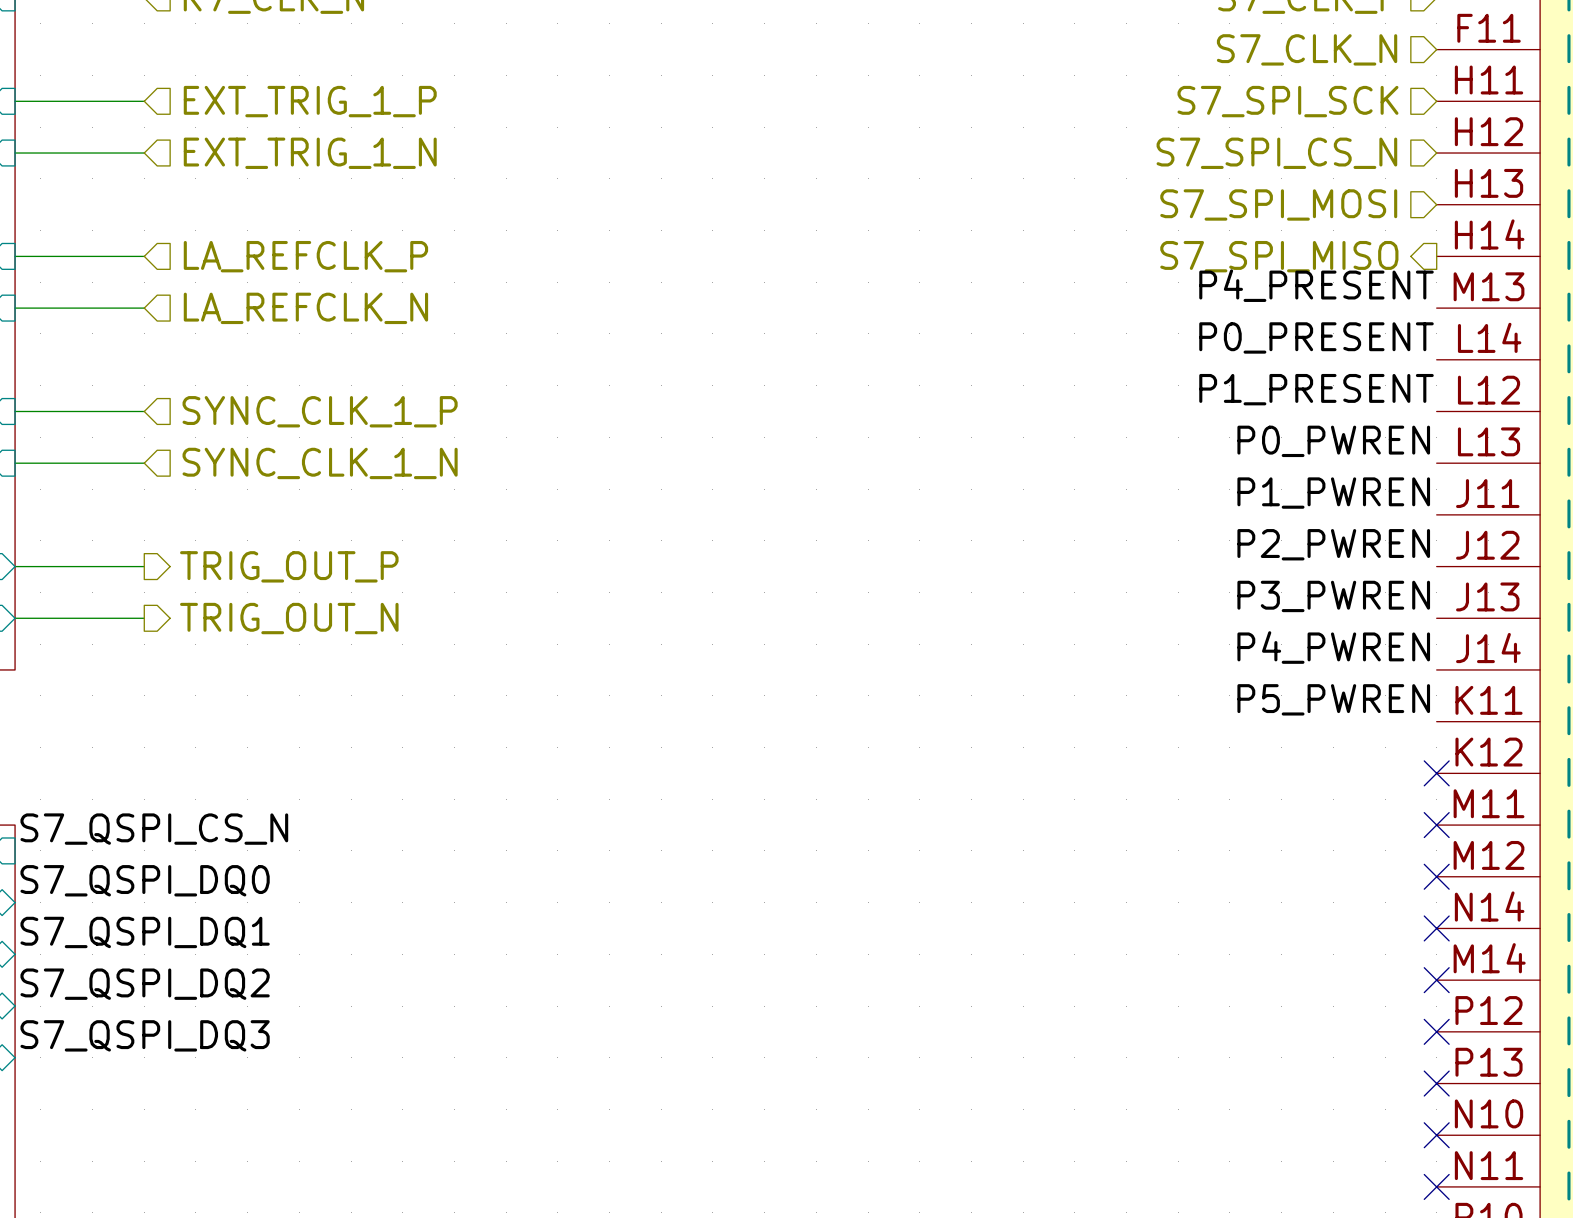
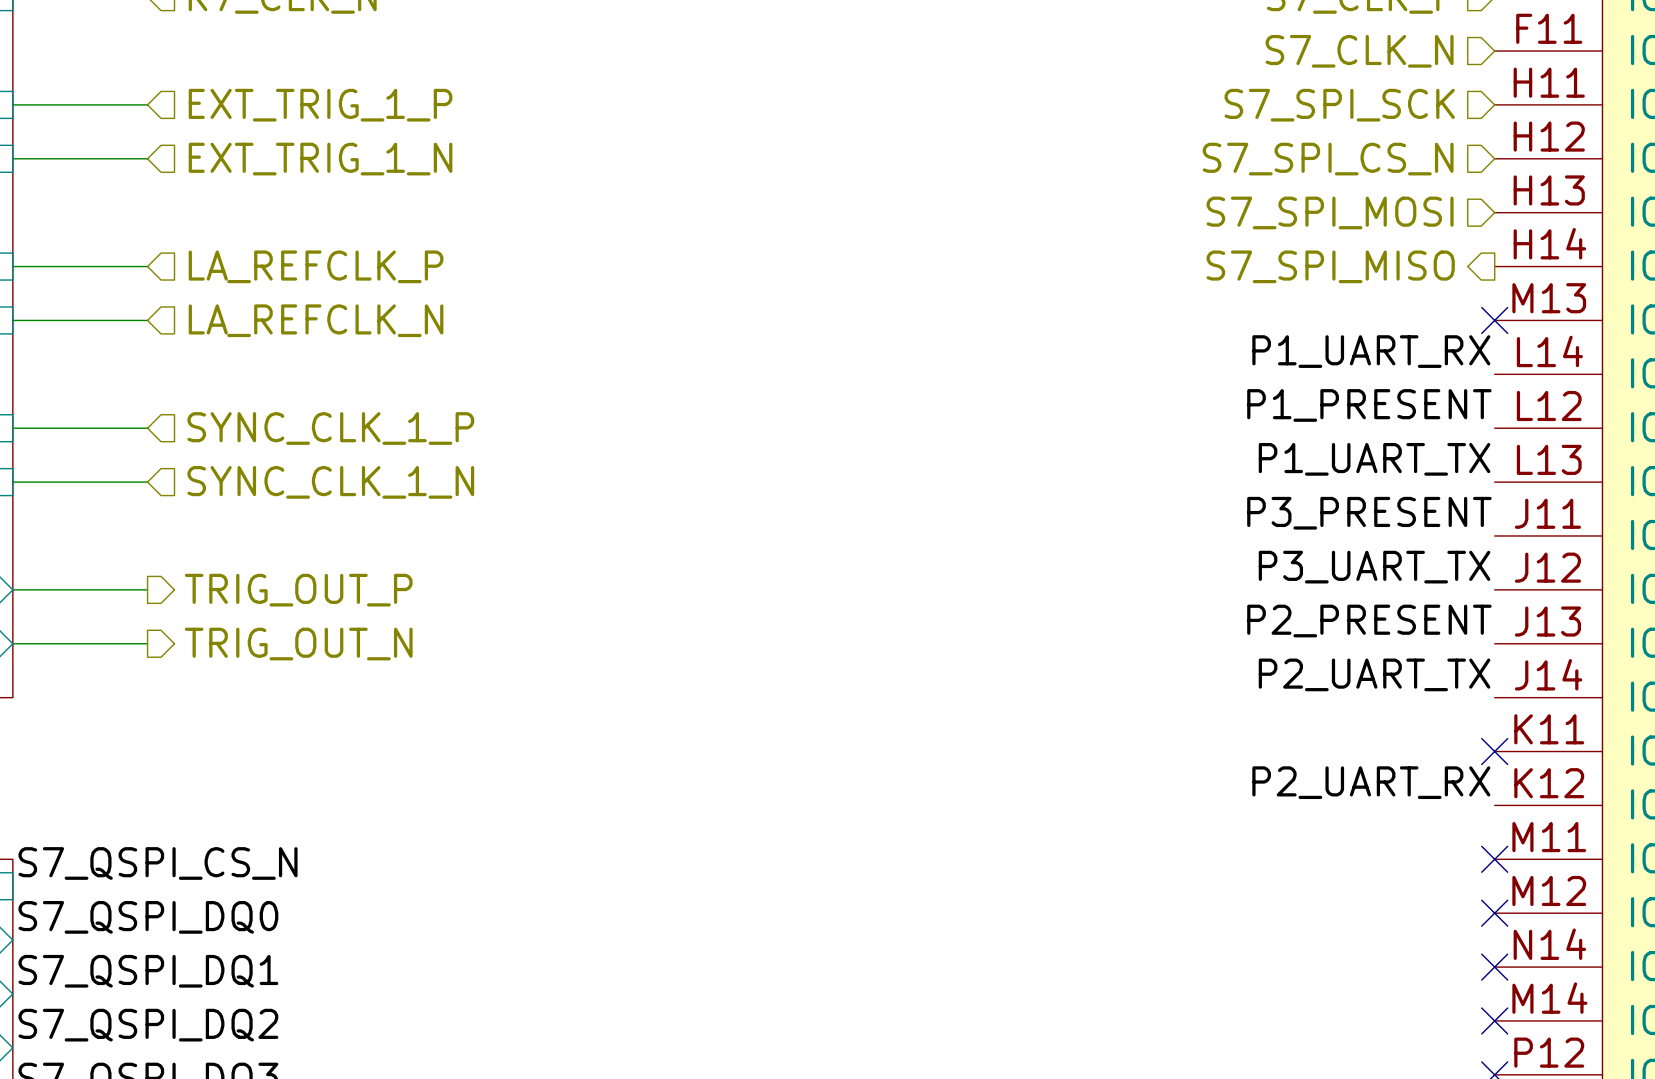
label: P4_PRESENT (1316, 285) -> none
no-connect mark: none -> (1494, 320)
label: P0_PRESENT (1316, 337) -> P1_UART_RX (1371, 351)
label: P0_PWREN (1333, 441) -> P1_UART_TX (1374, 459)
label: P1_PWREN (1333, 493) -> P3_PRESENT (1369, 513)
label: P2_PWREN (1333, 544) -> P3_UART_TX (1374, 567)
label: P3_PWREN (1333, 596) -> P2_PRESENT (1369, 621)
label: P4_PWREN (1333, 647) -> P2_UART_TX (1374, 674)
label: P5_PWREN (1333, 699) -> none
label: none -> P2_UART_RX (1371, 782)
no-connect mark position: (1436, 773) -> (1494, 751)

